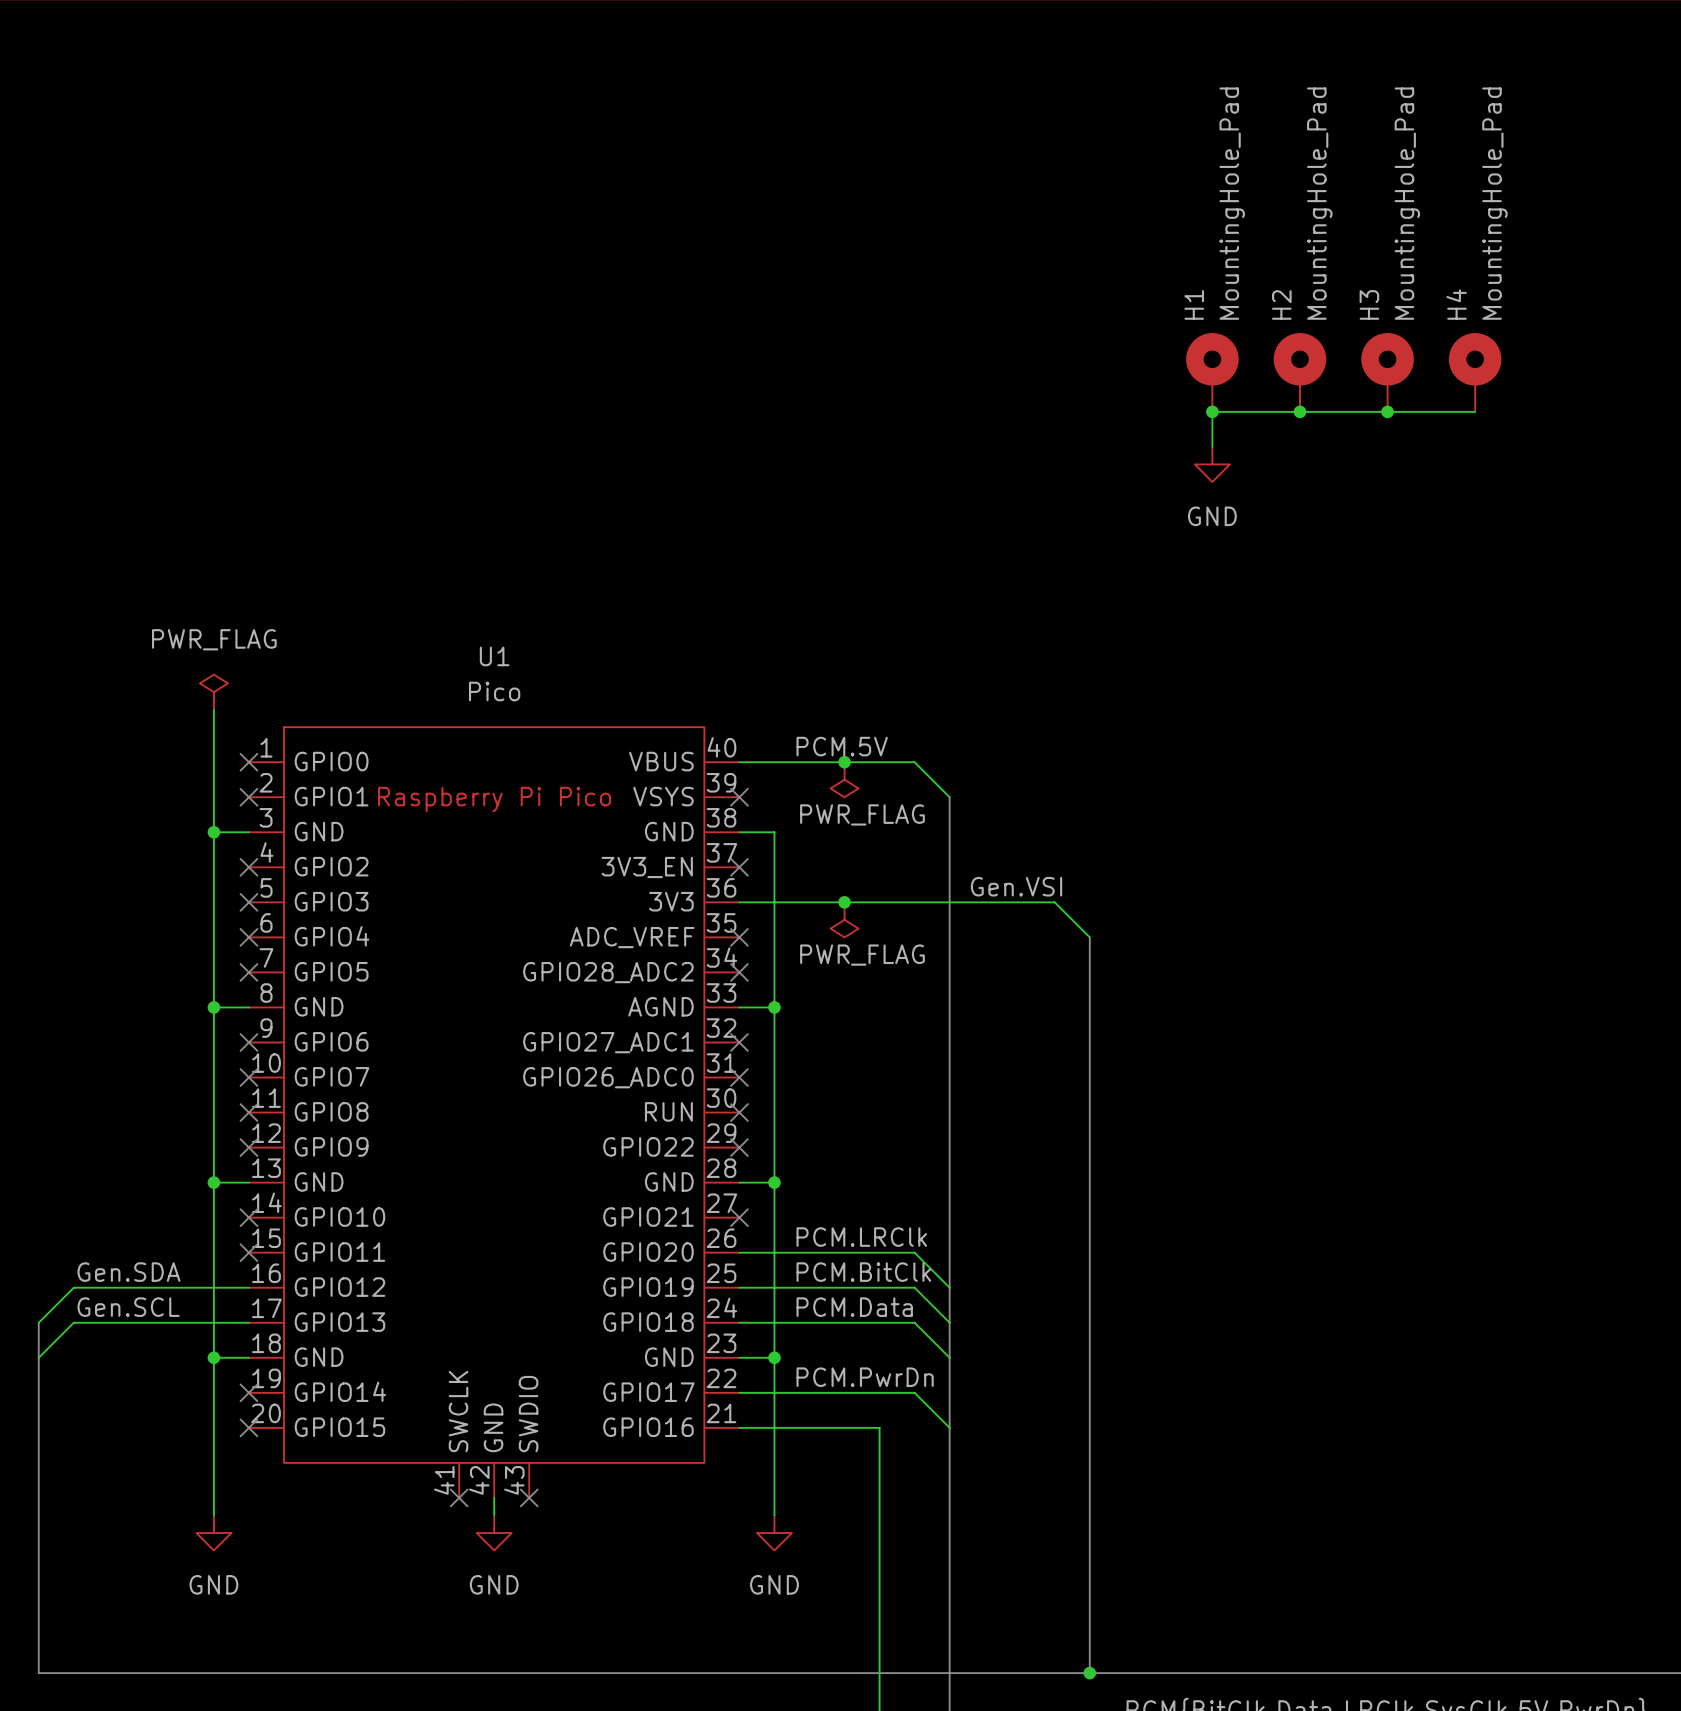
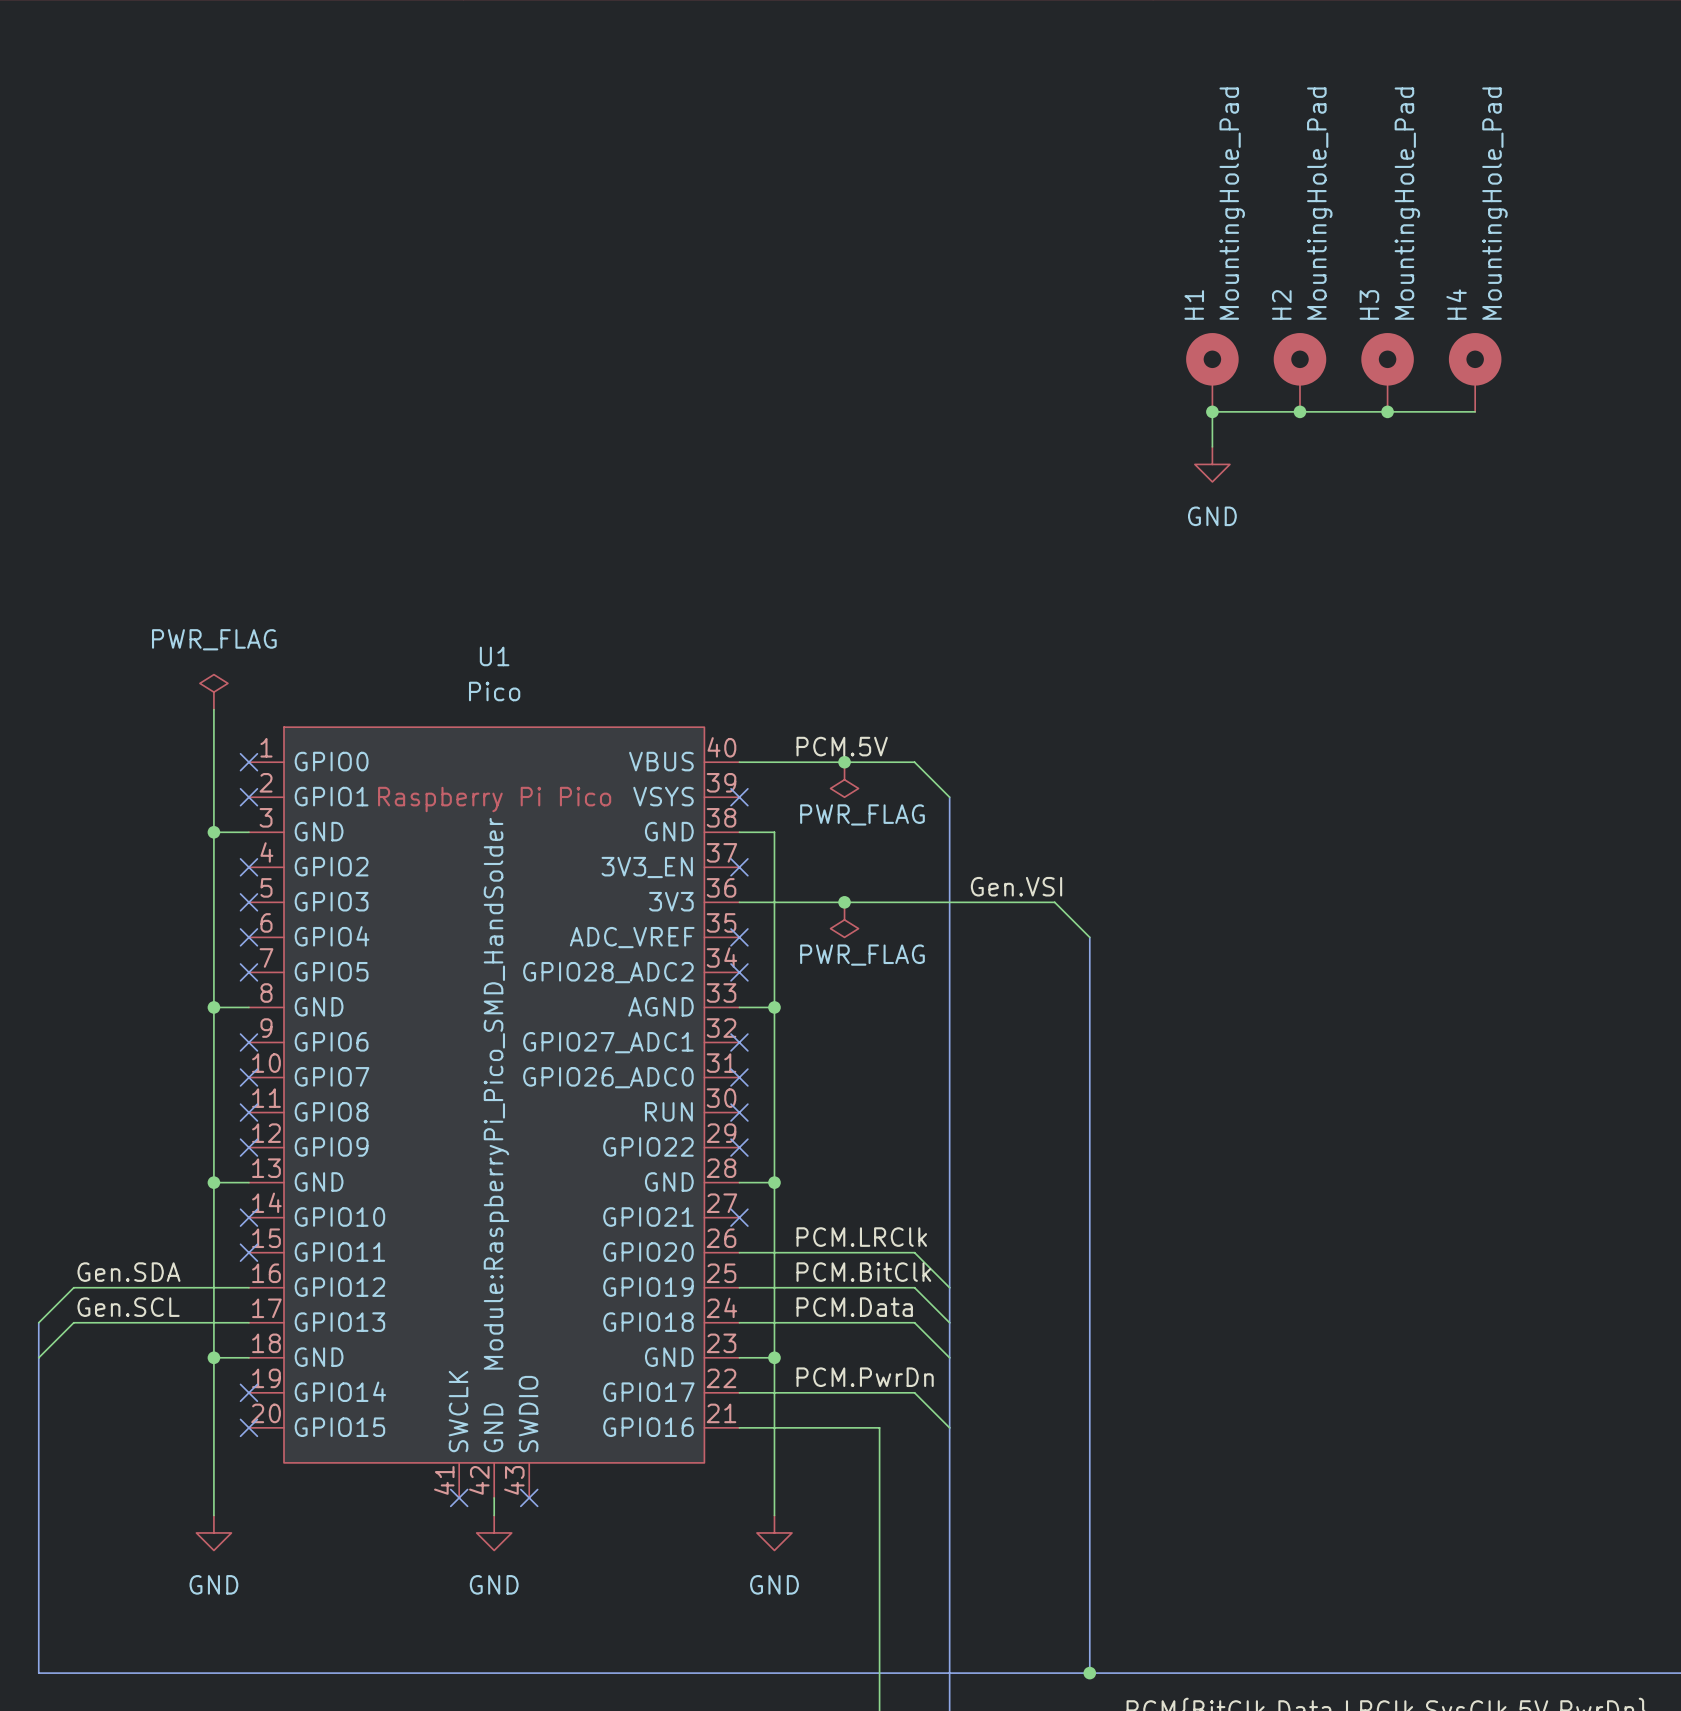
U1 text: none -> Module:RaspberryPi_Pico_SMD_HandSolder (496, 1093)

